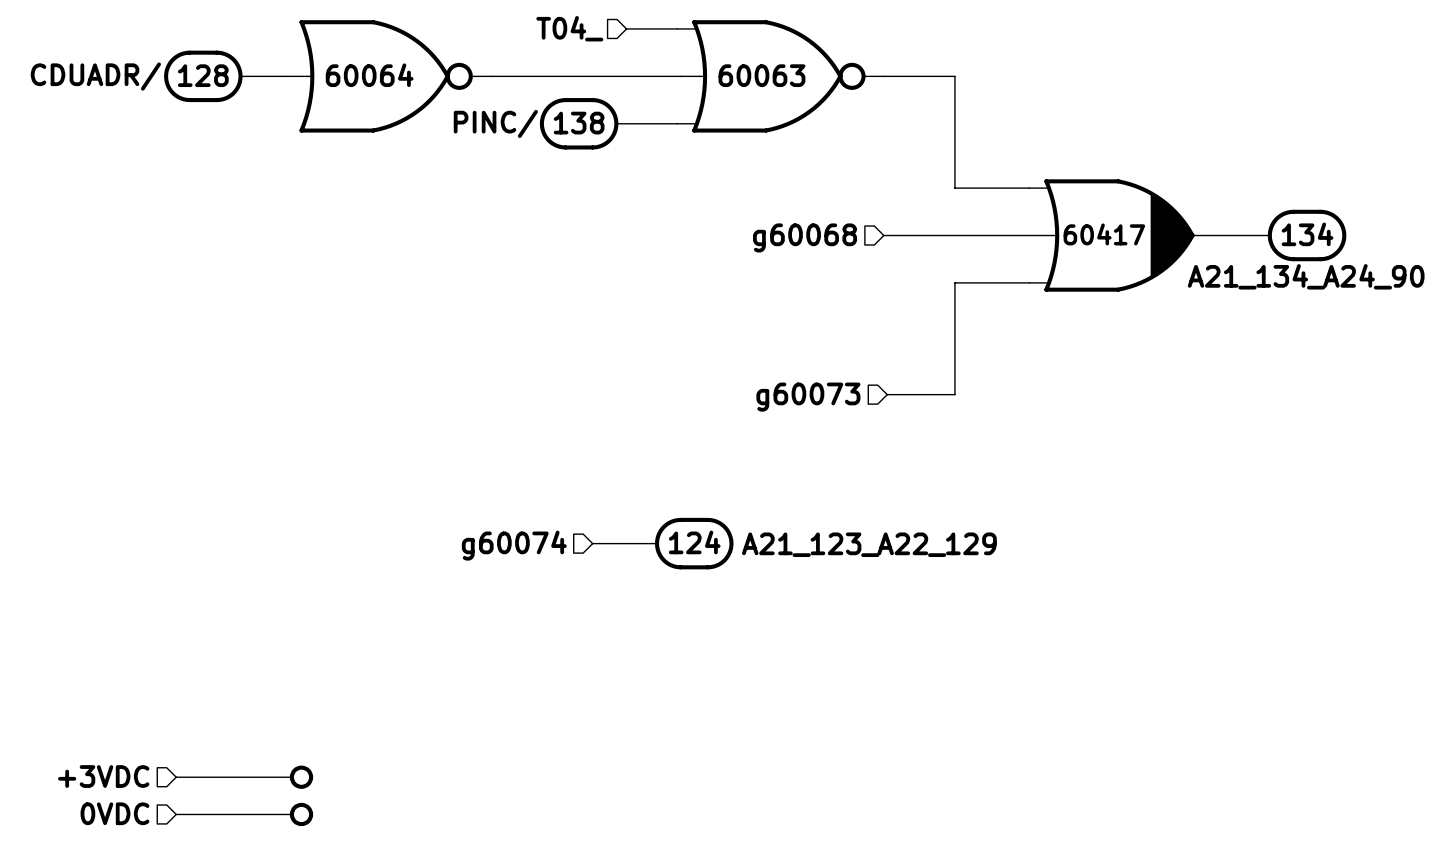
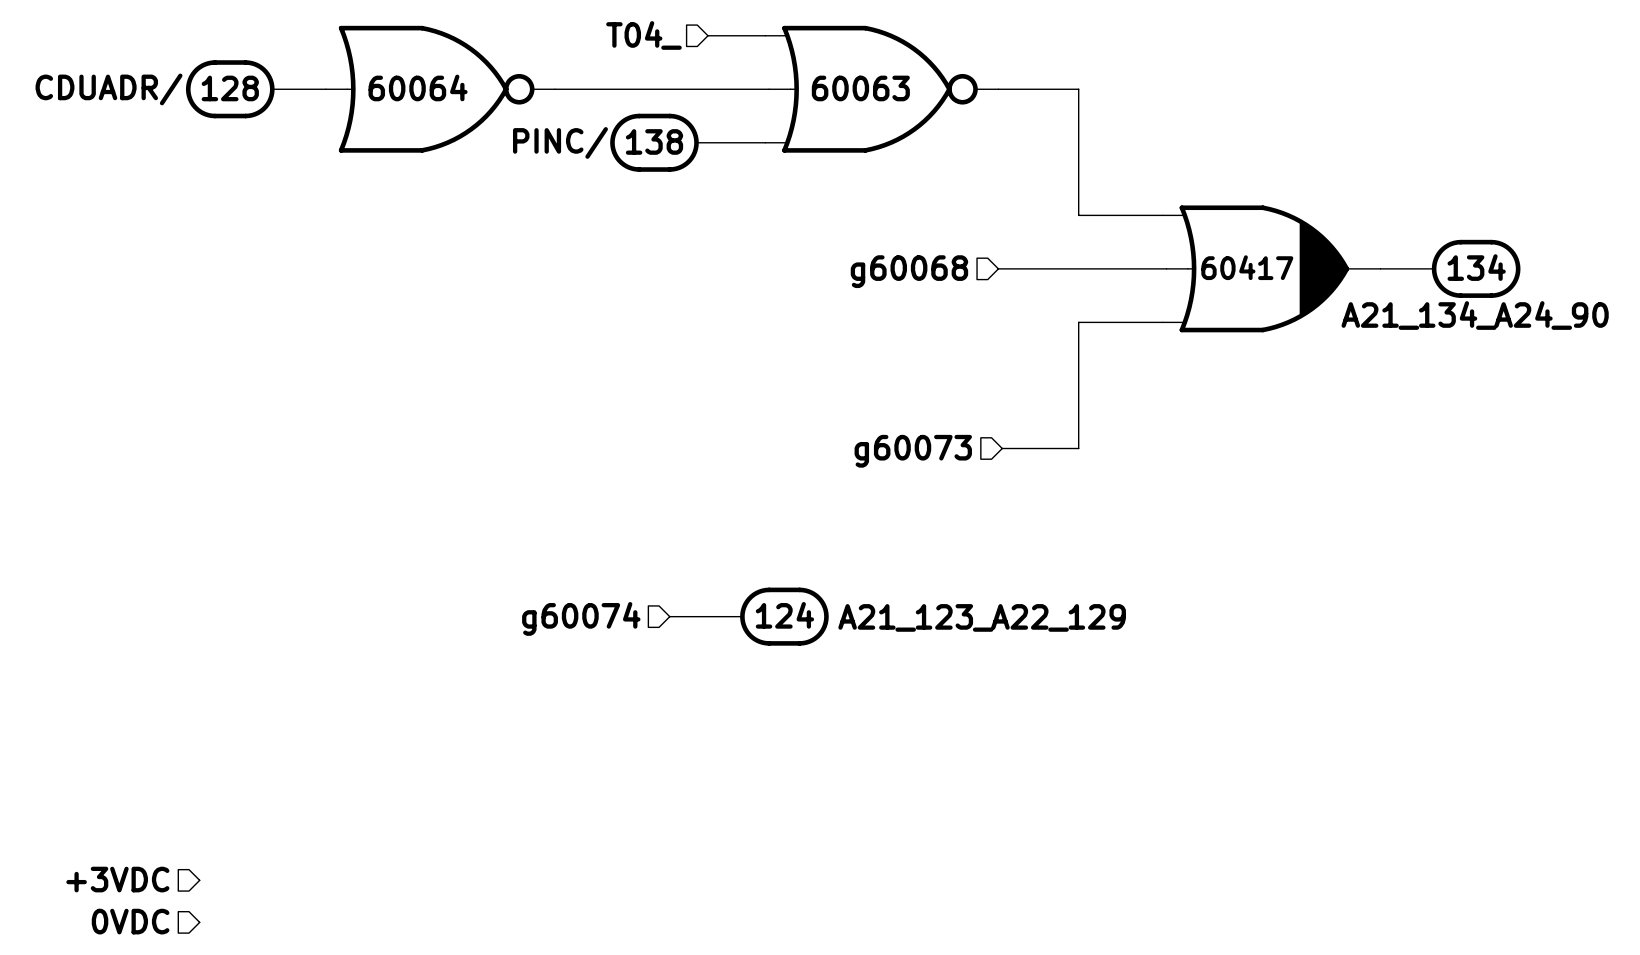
wire: (176, 777) (291, 777) -> none
part: (301, 777) -> none
wire: (176, 814) (291, 814) -> none
part: (301, 814) -> none

